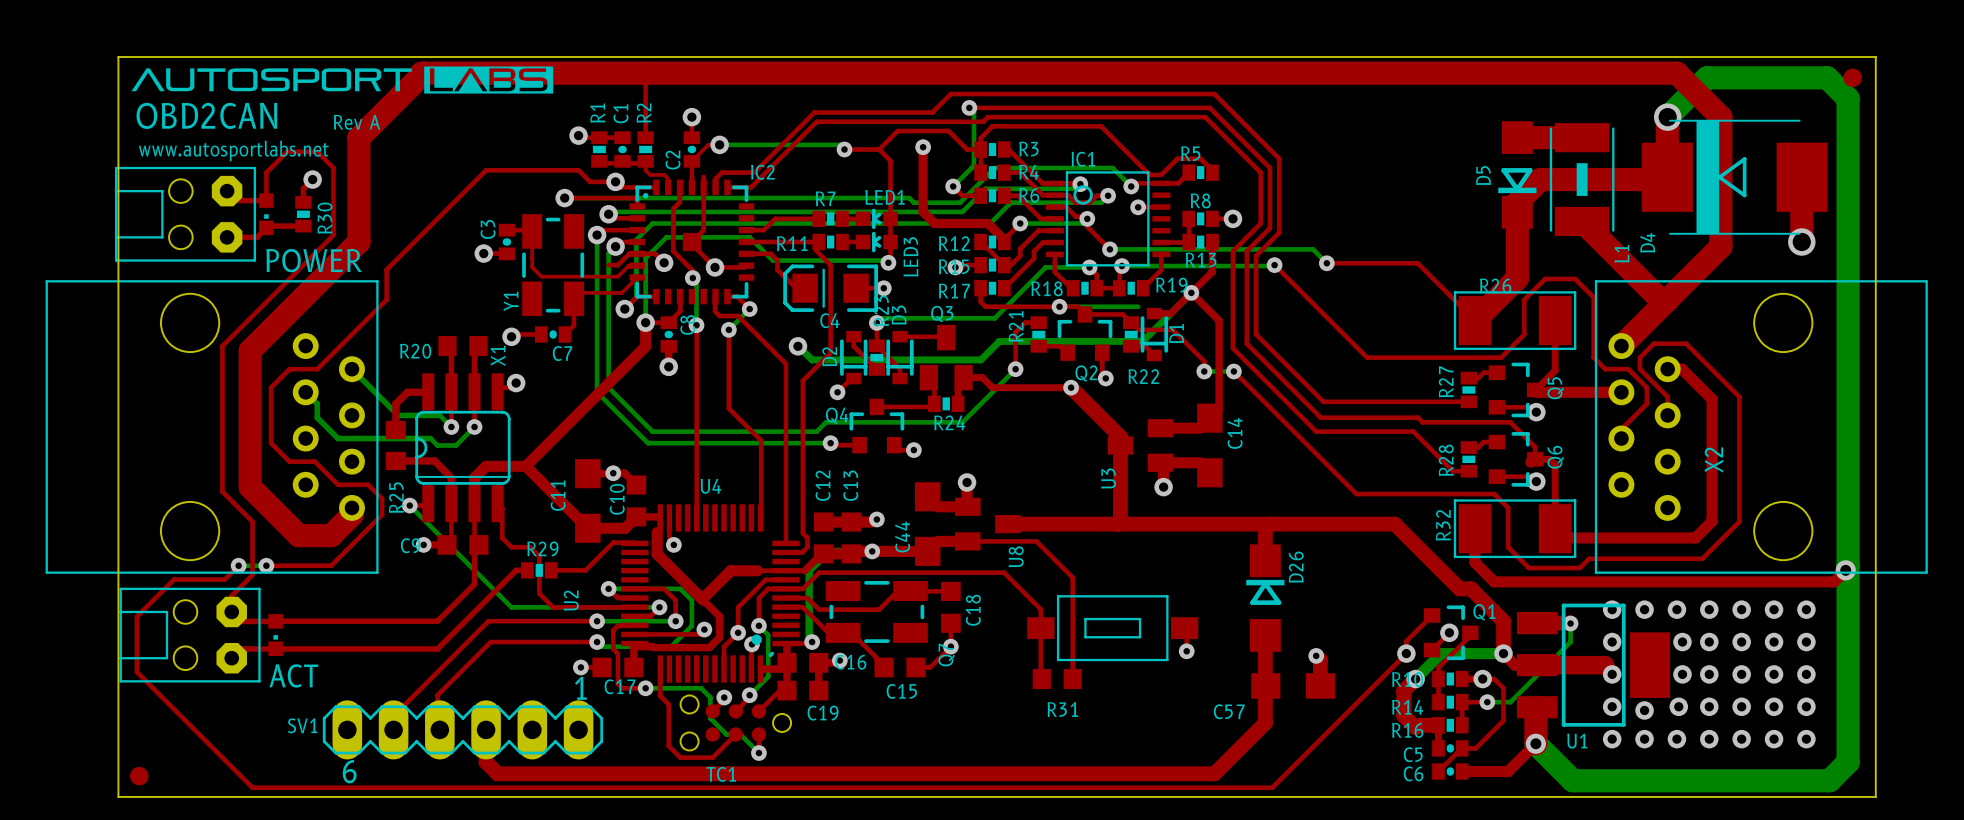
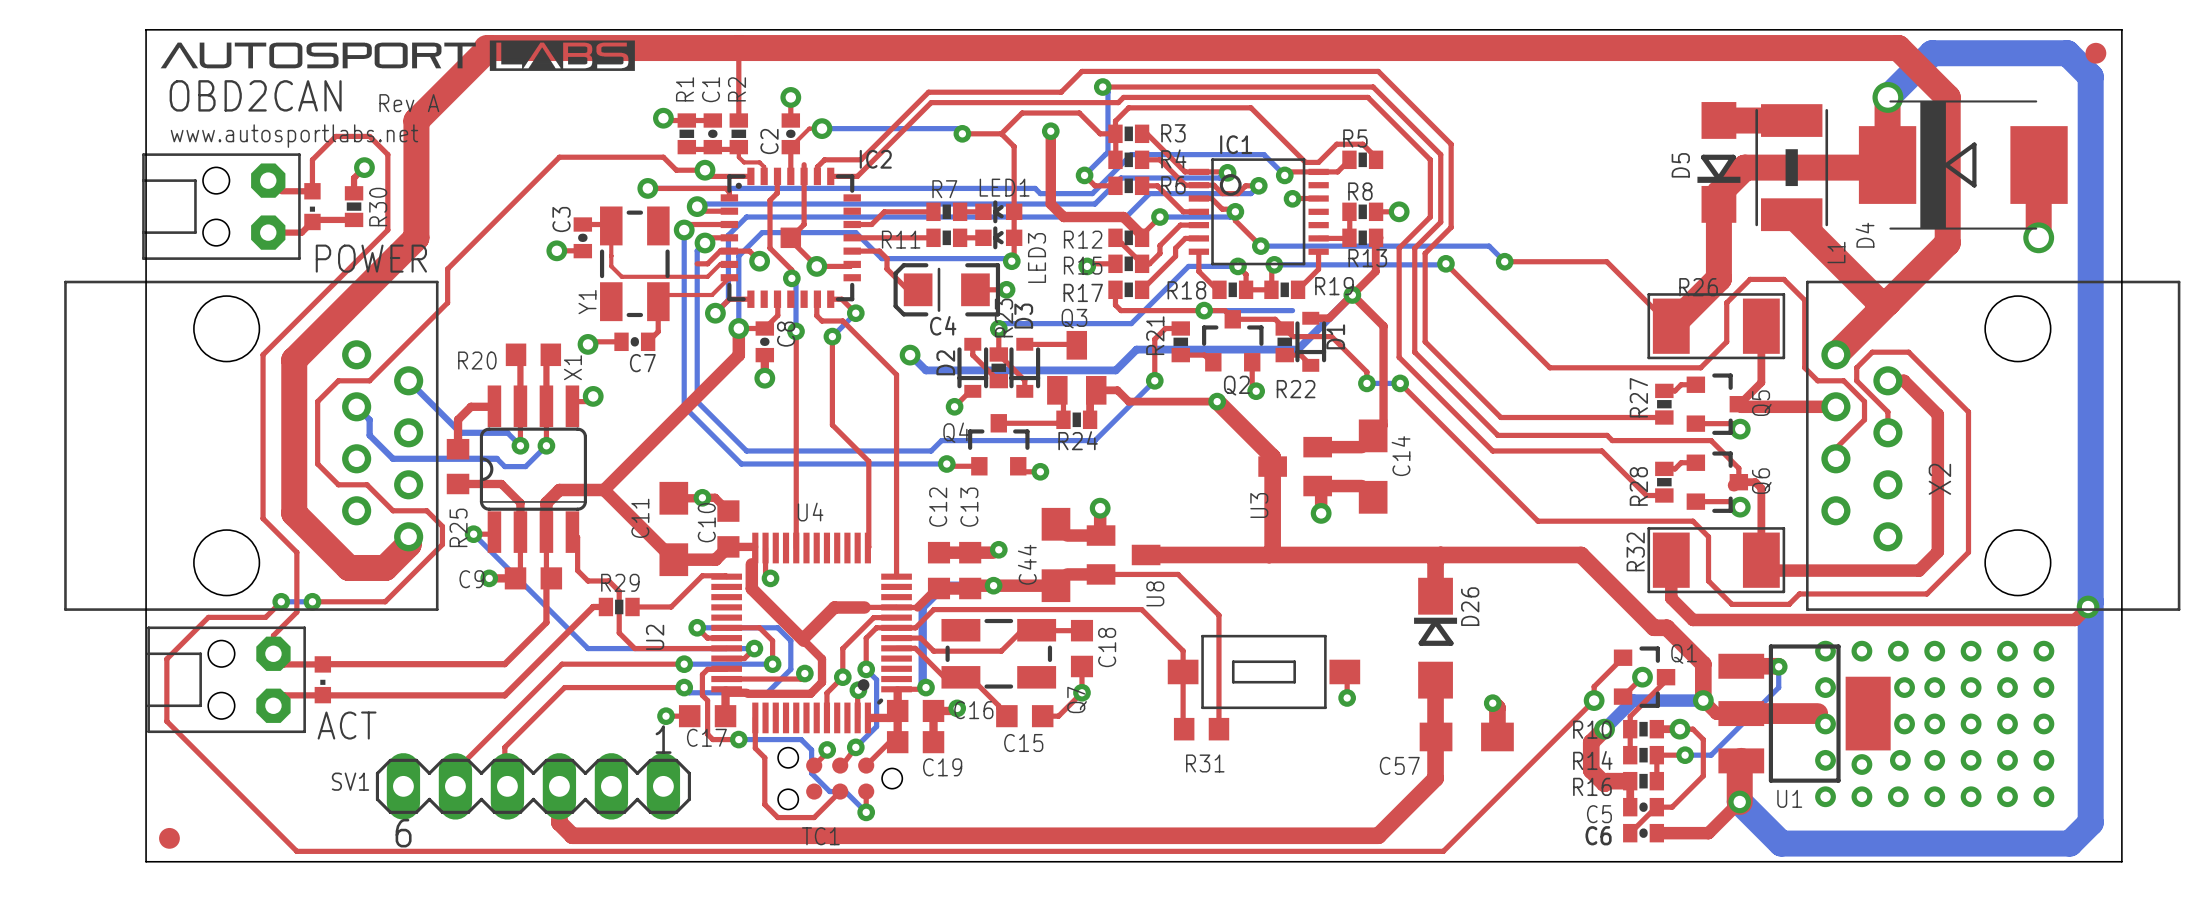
top track: (816, 242) (816, 251) (830, 265) (830, 352) (802, 380) (802, 533) (807, 537) (807, 547) (802, 552) (785, 552) -> none

